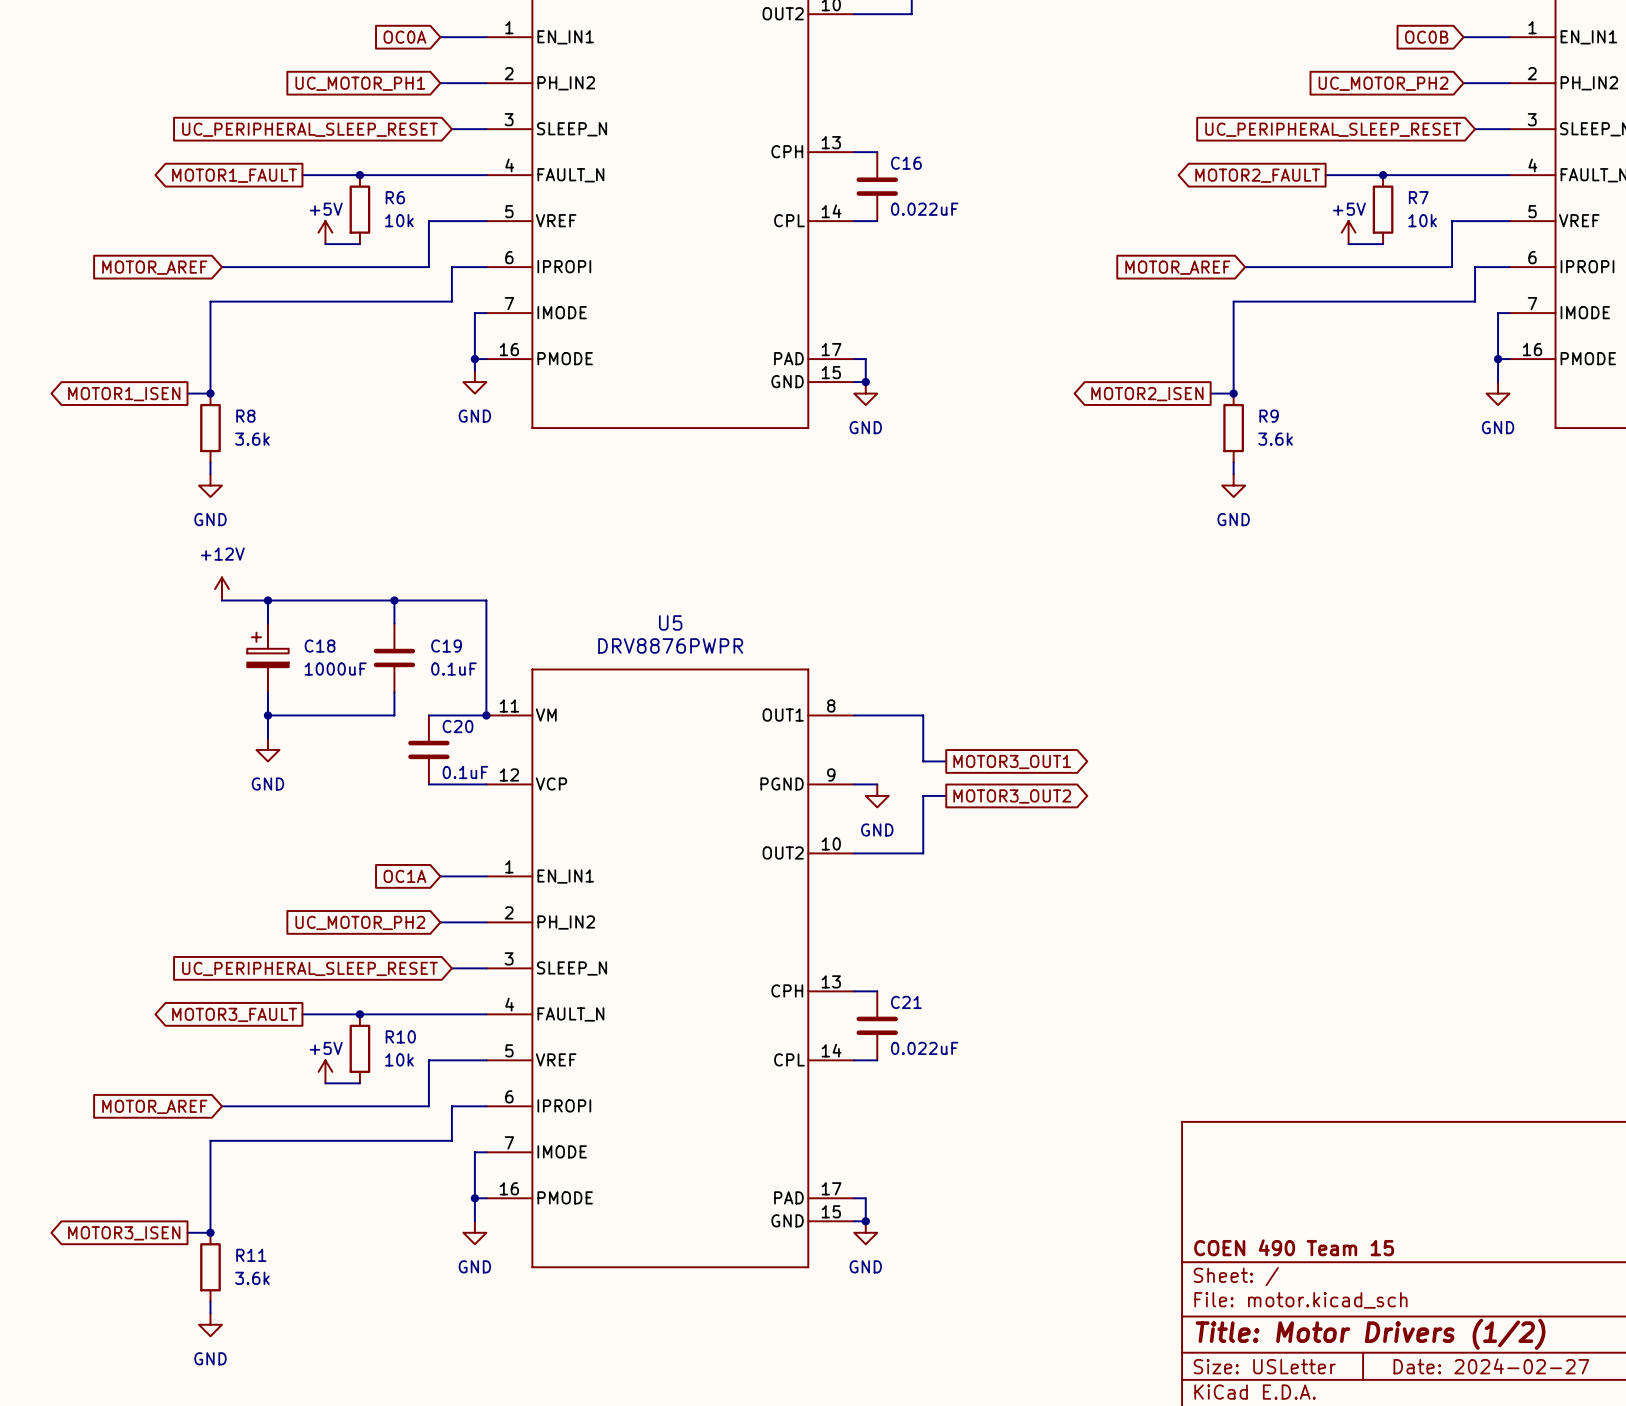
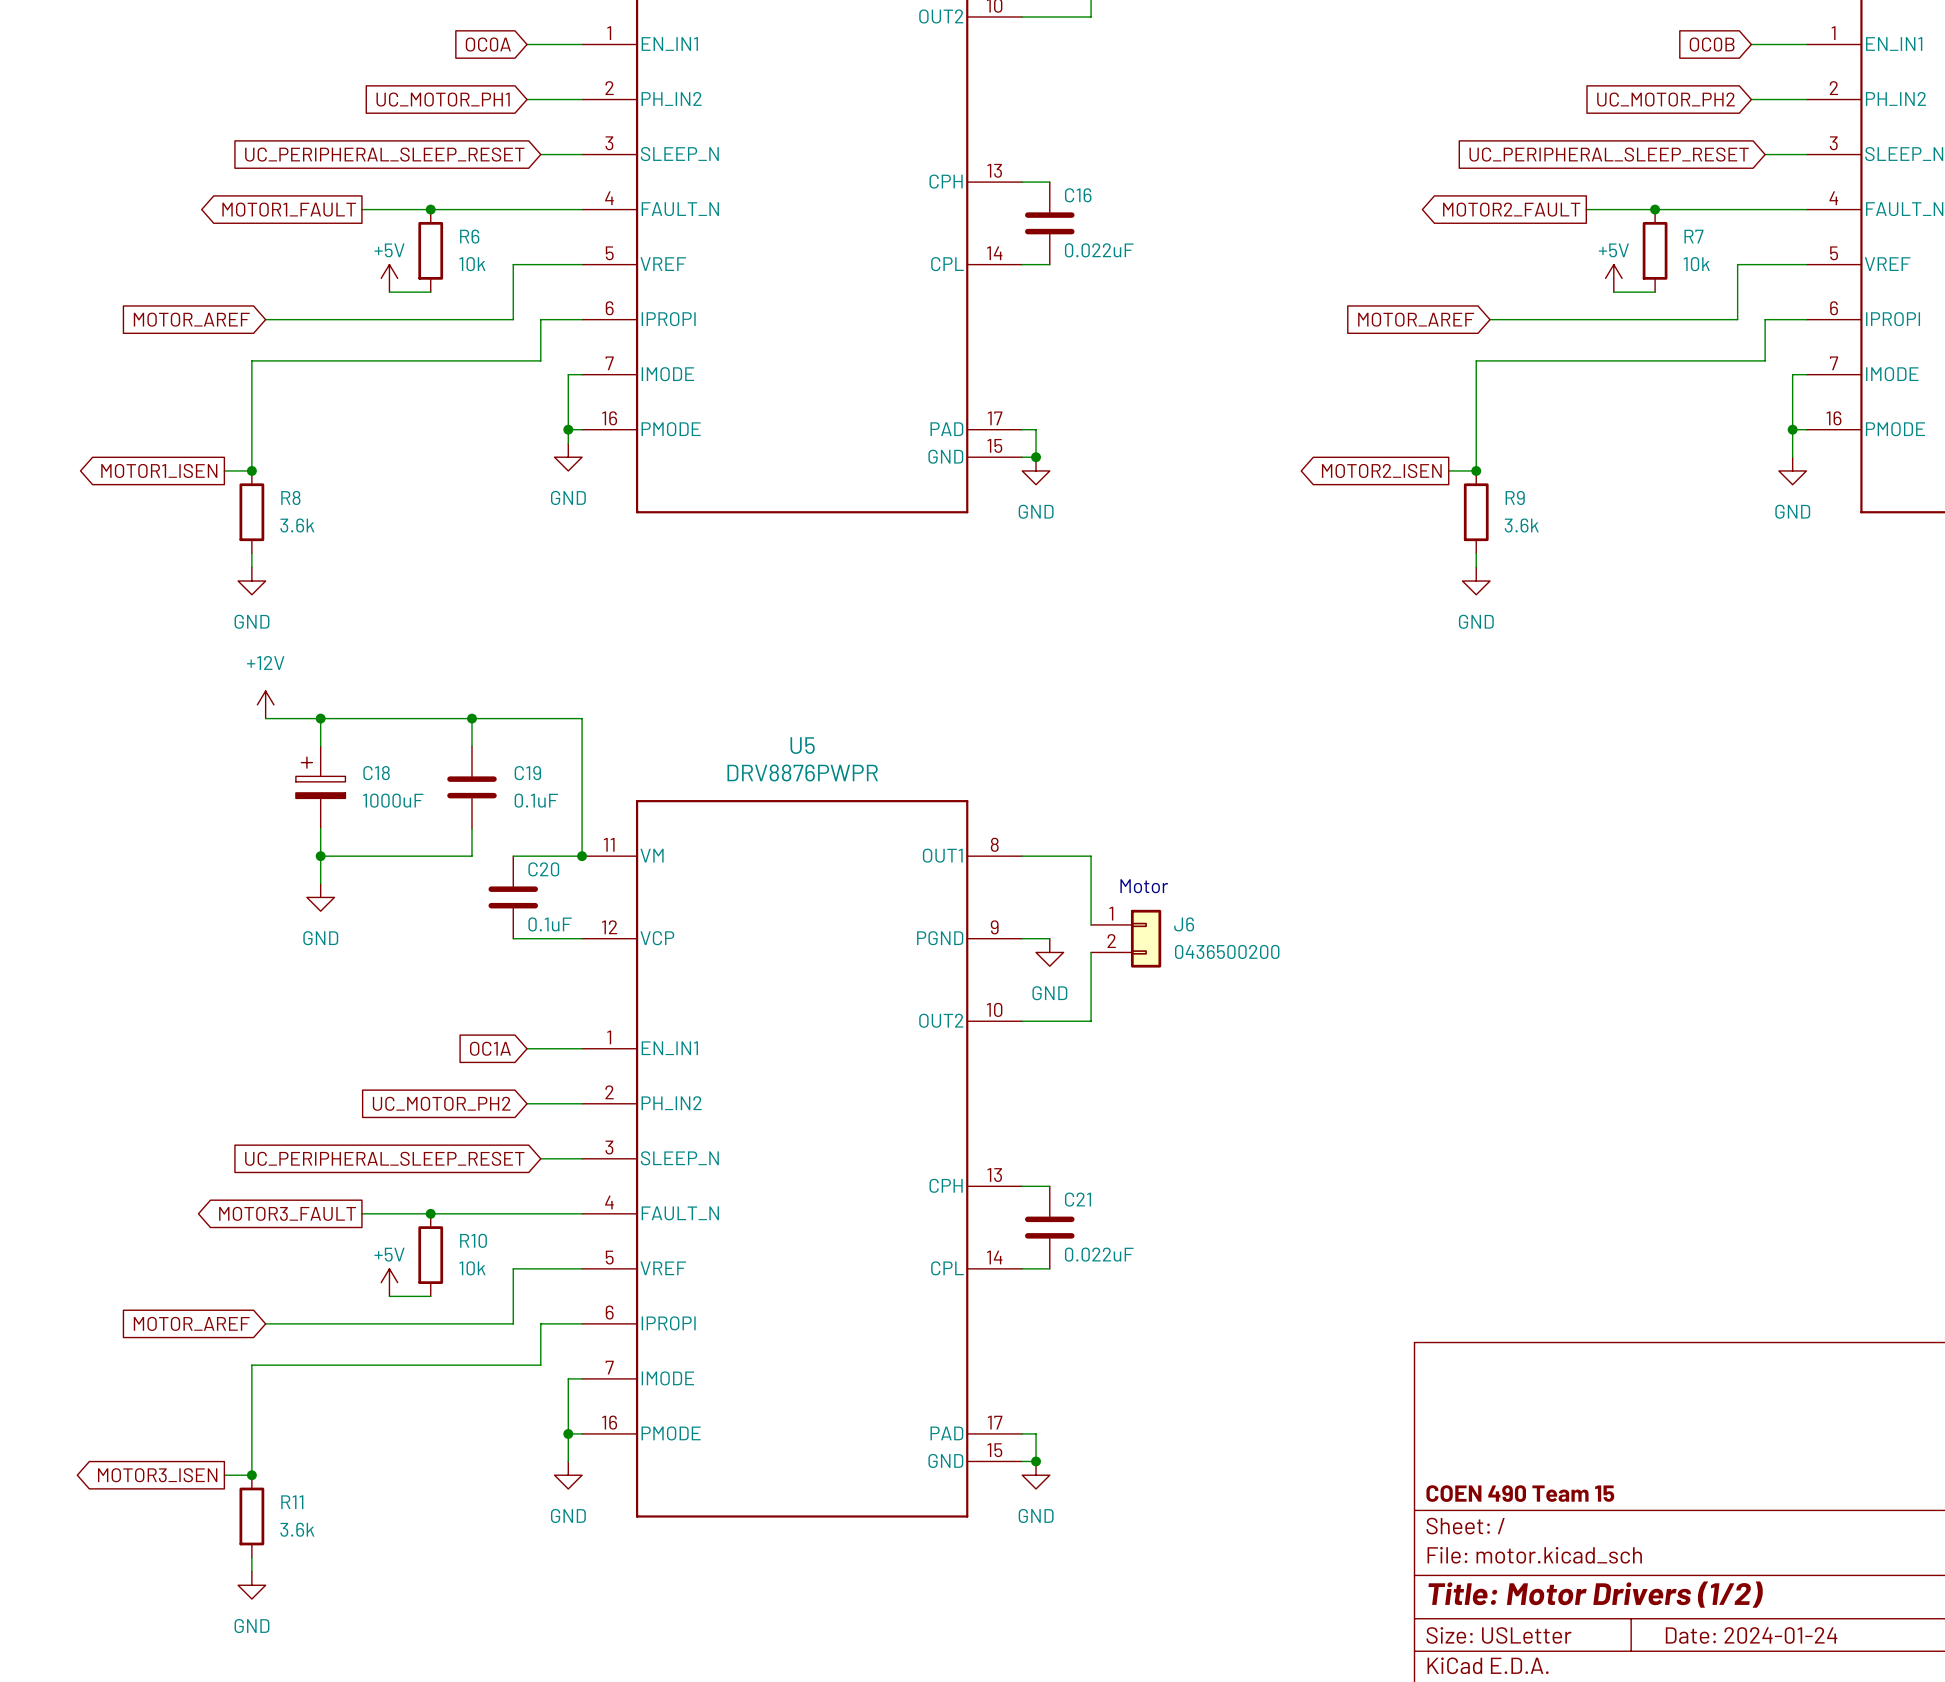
wire: (911, 715) (923, 715) (923, 761) (946, 761) -> (1091, 856) (1091, 924)
text: none -> Motor (1144, 886)
global label: MOTOR3_OUT1 (1012, 761) -> none
J6: none -> 0436500200 (1126, 938)
wire: (946, 795) (923, 795) (923, 853) (911, 853) -> (1091, 952) (1091, 1021)
global label: MOTOR3_OUT2 (1012, 796) -> none
title block: Date: 2024-02-27 (1491, 1366) -> Date: 2024-01-24 (1751, 1635)

